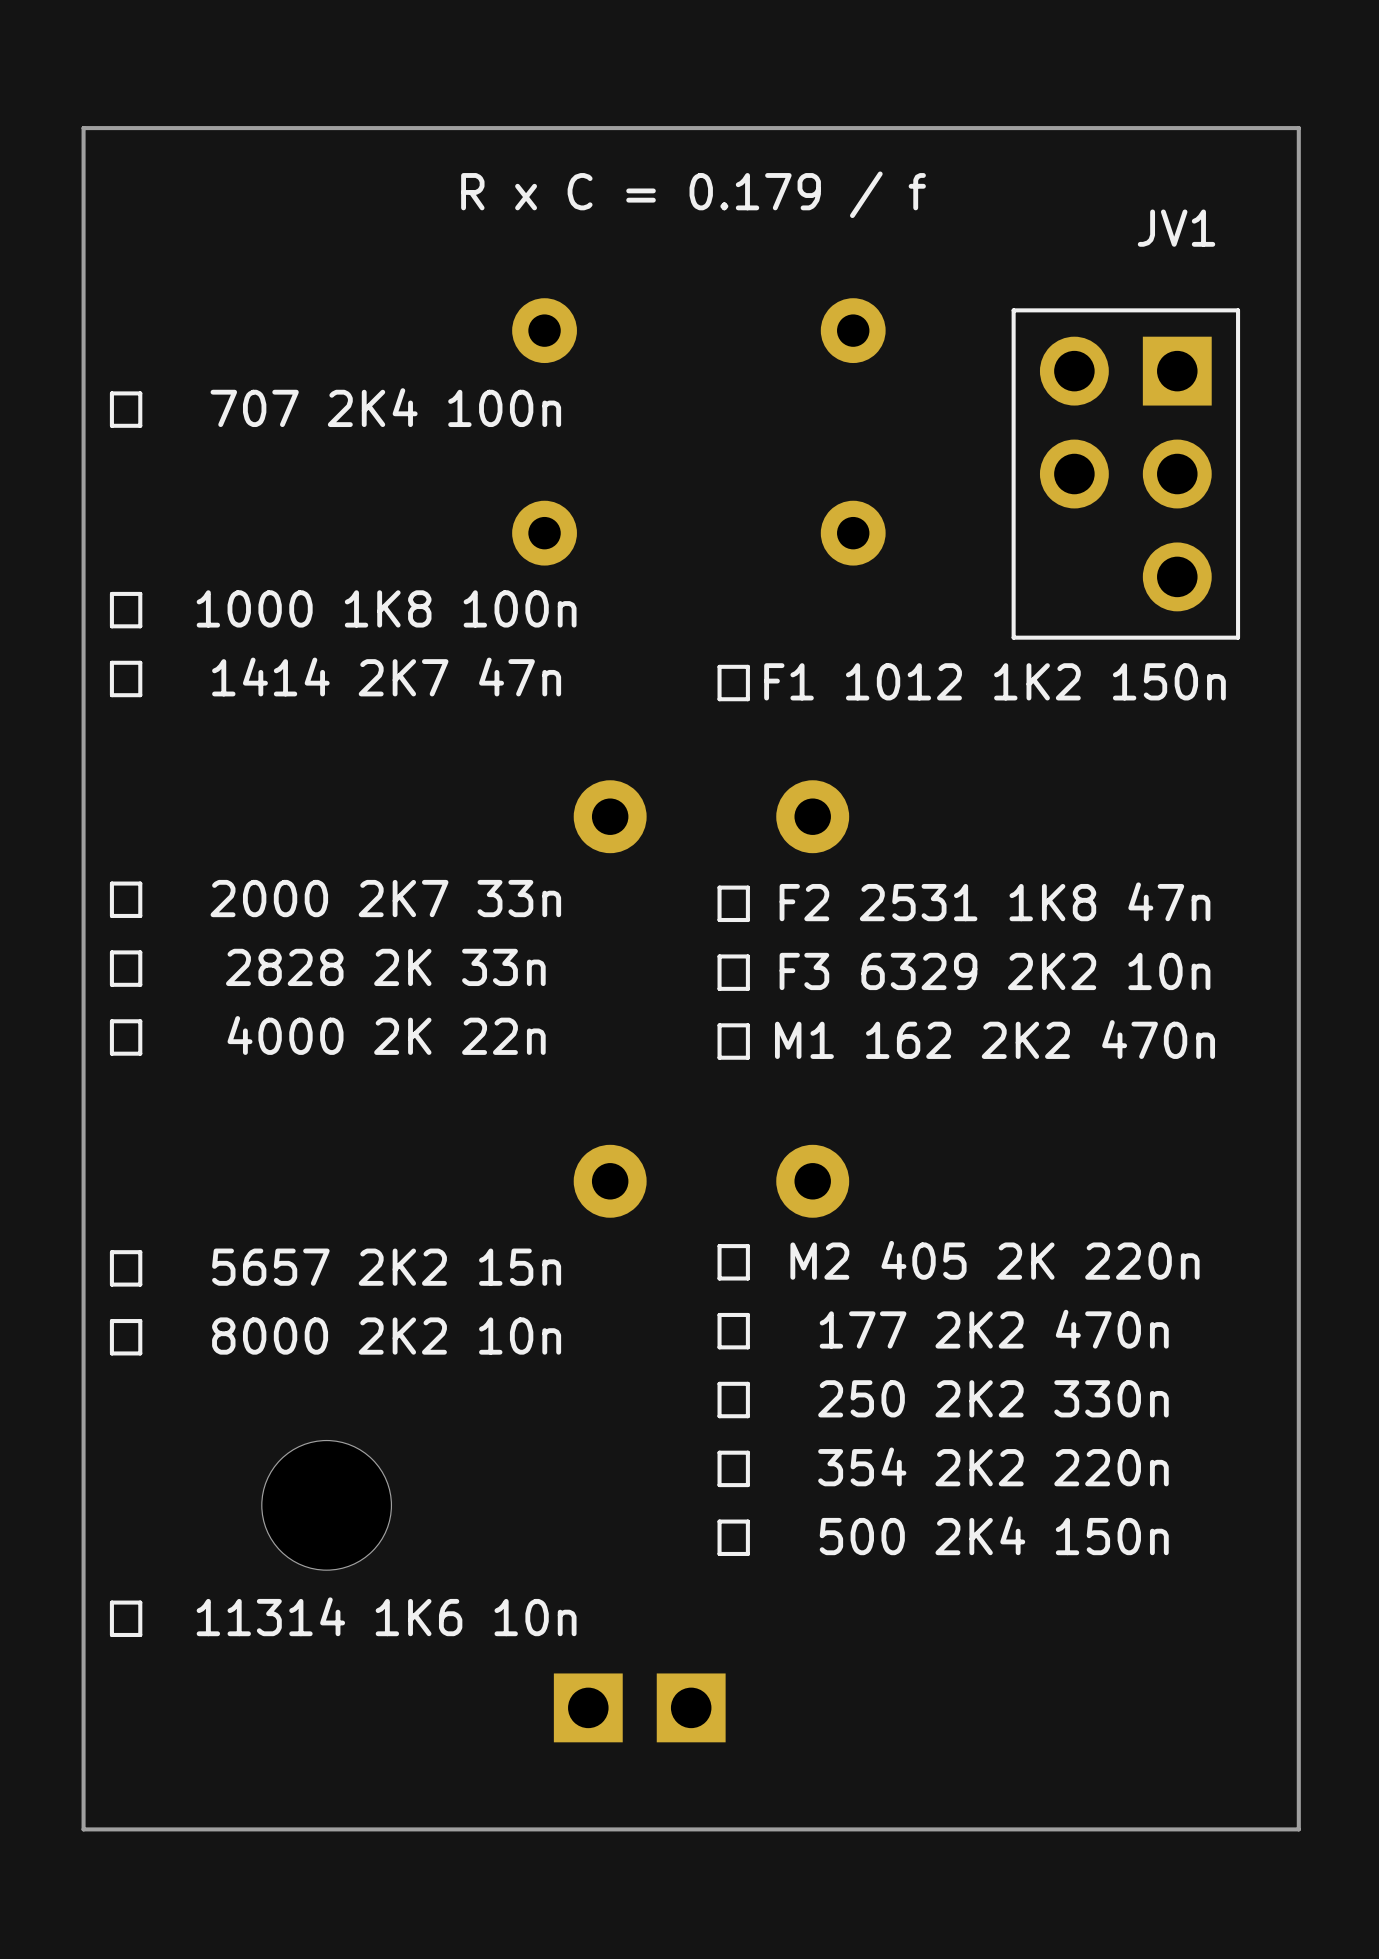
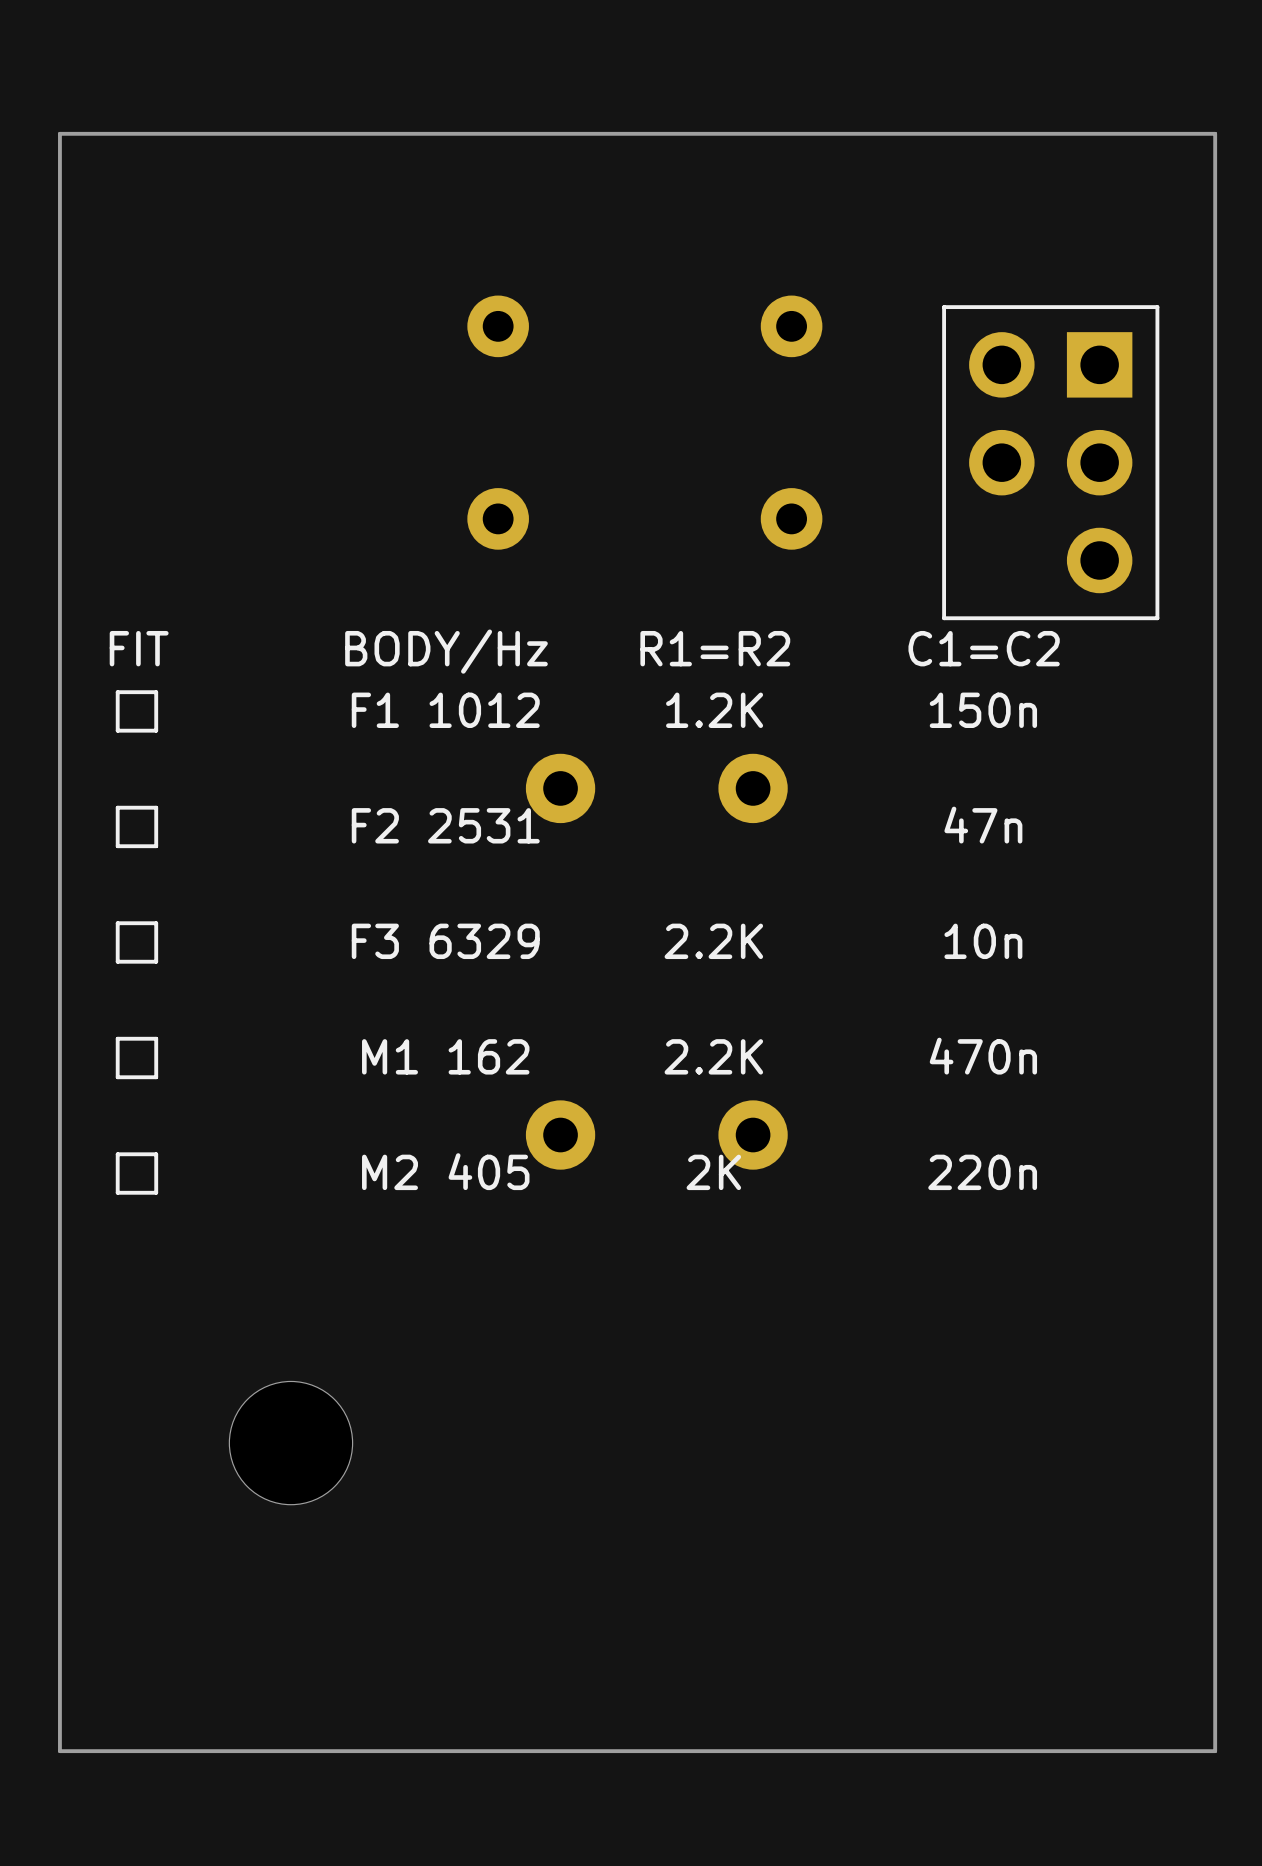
text: R x C = 0.179 / f (693, 194) -> none
JV1 name: JV1 (1176, 228) -> none
line: (140, 393) (140, 425) (111, 425) (111, 393) (140, 393) -> none
text: 707 2K4 100n (385, 407) -> none
line: (140, 593) (140, 626) (111, 626) (111, 593) (140, 593) -> none
text: 1000 1K8 100n (386, 608) -> none
line: (140, 662) (140, 695) (111, 695) (111, 662) (140, 662) -> none
line: (747, 666) (747, 699) (719, 699) (719, 666) (747, 666) -> none
text: none -> FIT (139, 648)
text: none -> R1=R2 (715, 648)
text: none -> C1=C2 (984, 648)
text: none -> BODY/Hz (446, 651)
text: 1414 2K7 47n (386, 677) -> none
text: F1 1012 1K2 150n (995, 681) -> none
line: none -> (156, 692) (156, 730) (117, 730) (117, 692) (156, 692)
text: none -> F1 1012 (445, 710)
text: none -> 1.2K (714, 710)
text: none -> 150n (983, 710)
line: none -> (156, 807) (156, 846) (117, 846) (117, 807) (156, 807)
text: none -> 47n (983, 825)
text: none -> F2 2531 (445, 825)
line: (140, 883) (140, 915) (111, 915) (111, 883) (140, 883) -> none
line: (747, 887) (747, 920) (719, 920) (719, 887) (747, 887) -> none
text: 2000 2K7 33n (385, 898) -> none
text: F2 2531 1K8 47n (995, 901) -> none
line: (140, 952) (140, 984) (111, 984) (111, 952) (140, 952) -> none
line: (747, 956) (747, 988) (719, 988) (719, 956) (747, 956) -> none
line: none -> (156, 923) (156, 961) (117, 961) (117, 923) (156, 923)
text: 2828 2K 33n (385, 967) -> none
text: F3 6329 2K2 10n (995, 971) -> none
text: none -> F3 6329 (445, 941)
text: none -> 2.2K (713, 941)
text: none -> 10n (983, 941)
line: (140, 1021) (140, 1053) (111, 1053) (111, 1021) (140, 1021) -> none
line: (747, 1025) (747, 1057) (719, 1057) (719, 1025) (747, 1025) -> none
text: 4000 2K 22n (386, 1035) -> none
text: M1 162 2K2 470n (995, 1039) -> none
line: none -> (156, 1038) (156, 1077) (117, 1077) (117, 1038) (156, 1038)
text: none -> 470n (983, 1056)
text: none -> M1 162 (445, 1056)
text: none -> 2.2K (713, 1056)
line: none -> (156, 1154) (156, 1192) (117, 1192) (117, 1154) (156, 1154)
text: none -> M2 405 (445, 1171)
text: none -> 2K (713, 1172)
text: none -> 220n (982, 1172)
line: (747, 1246) (747, 1278) (719, 1278) (719, 1246) (747, 1246) -> none
line: (140, 1252) (140, 1284) (111, 1284) (111, 1252) (140, 1252) -> none
text: M2 405 2K 220n (995, 1260) -> none
text: 5657 2K2 15n (386, 1267) -> none
line: (747, 1314) (747, 1347) (719, 1347) (719, 1314) (747, 1314) -> none
line: (140, 1321) (140, 1353) (111, 1353) (111, 1321) (140, 1321) -> none
text: 177 2K2 470n (994, 1329) -> none
text: 8000 2K2 10n (386, 1336) -> none
line: (747, 1383) (747, 1416) (719, 1416) (719, 1383) (747, 1383) -> none
text: 250 2K2 330n (993, 1398) -> none
line: (747, 1452) (747, 1485) (719, 1485) (719, 1452) (747, 1452) -> none
text: 354 2K2 220n (993, 1466) -> none
line: (747, 1521) (747, 1553) (719, 1553) (719, 1521) (747, 1521) -> none
text: 500 2K4 150n (994, 1535) -> none
line: (140, 1602) (140, 1634) (111, 1634) (111, 1602) (140, 1602) -> none
text: 11314 1K6 10n (386, 1616) -> none
part: (588, 1707) -> none
part: (691, 1707) -> none

